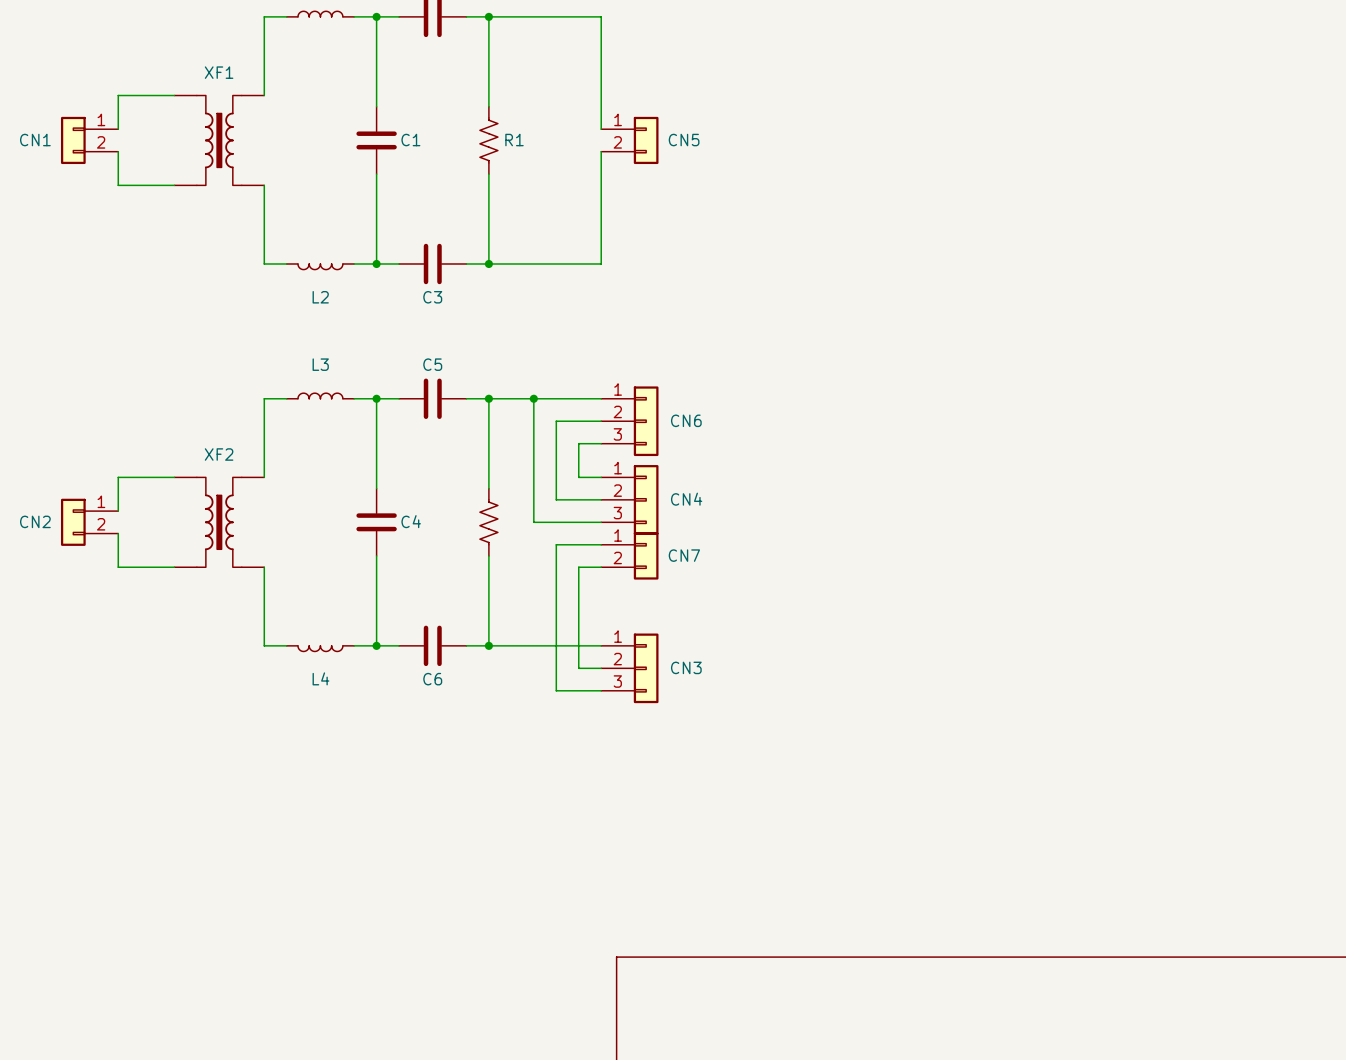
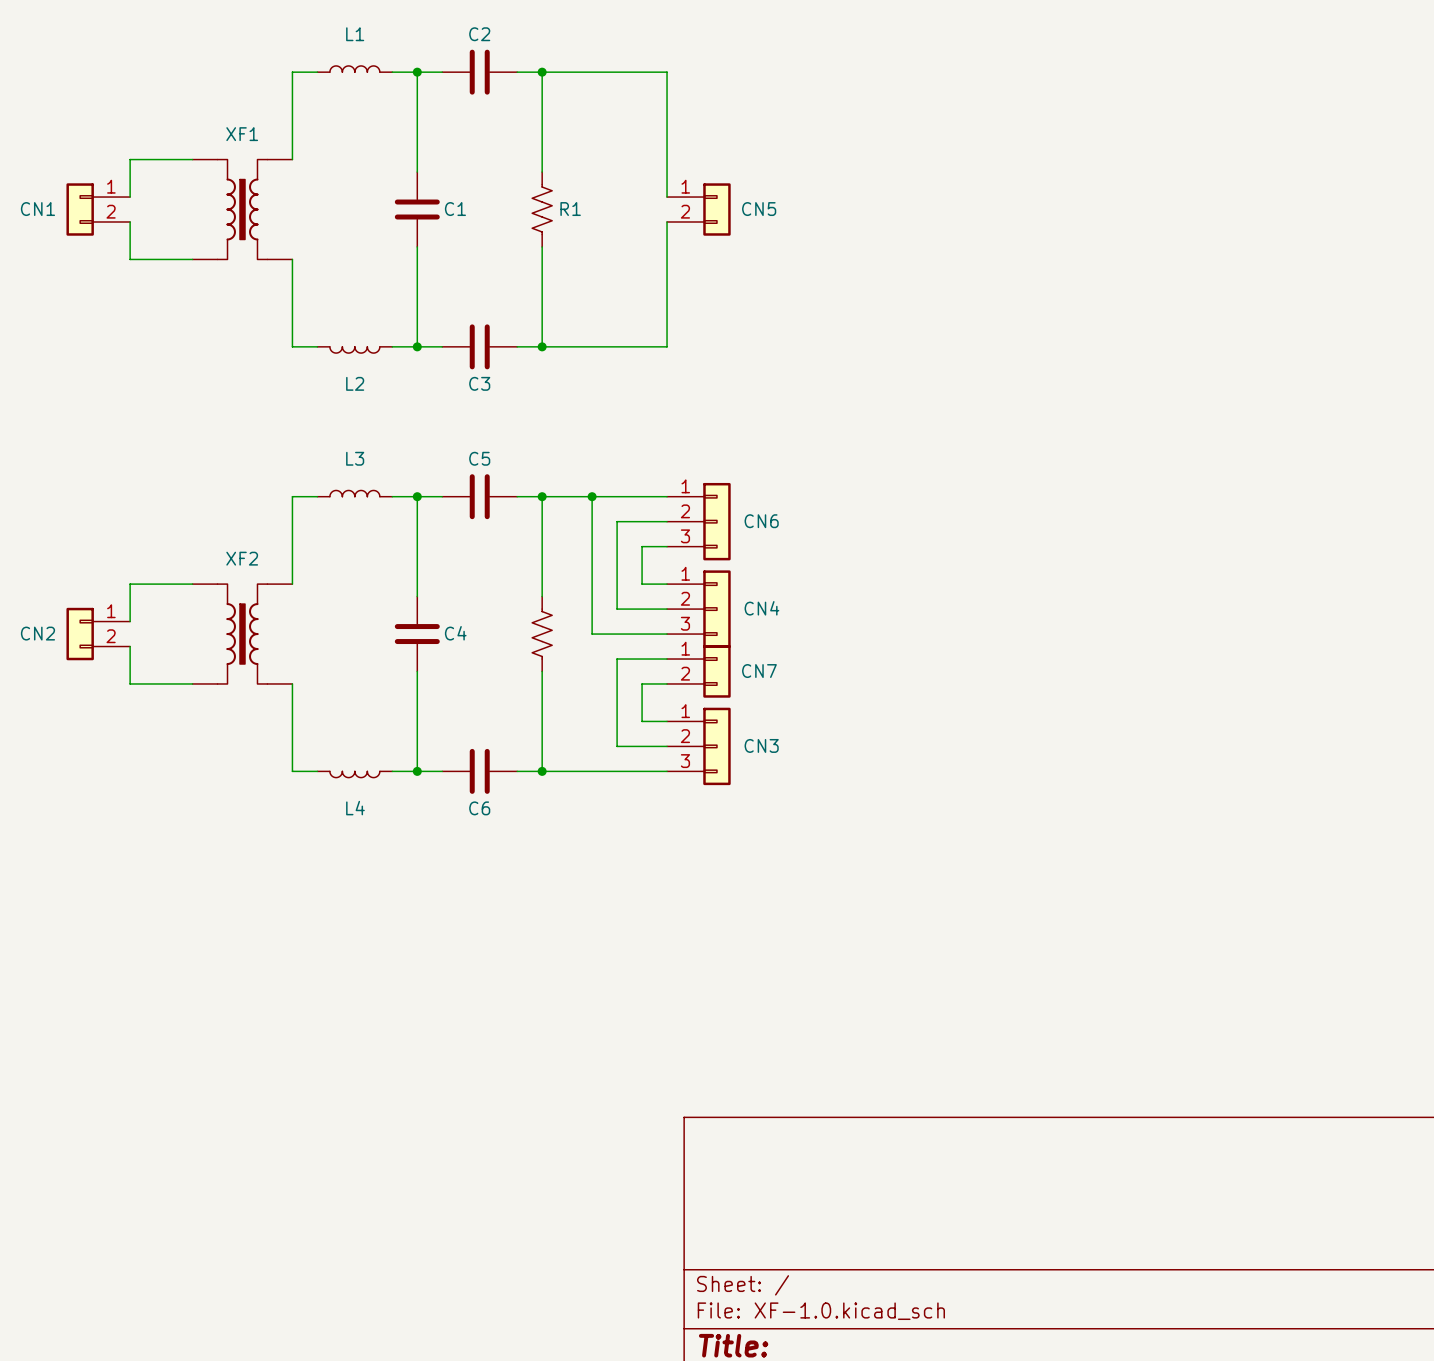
wire: (578, 600) (578, 668) (601, 668) -> (642, 721) (667, 721)
wire: (556, 623) (556, 690) (601, 690) -> (617, 746) (667, 746)
CN3 position: (629, 668) -> (698, 746)

